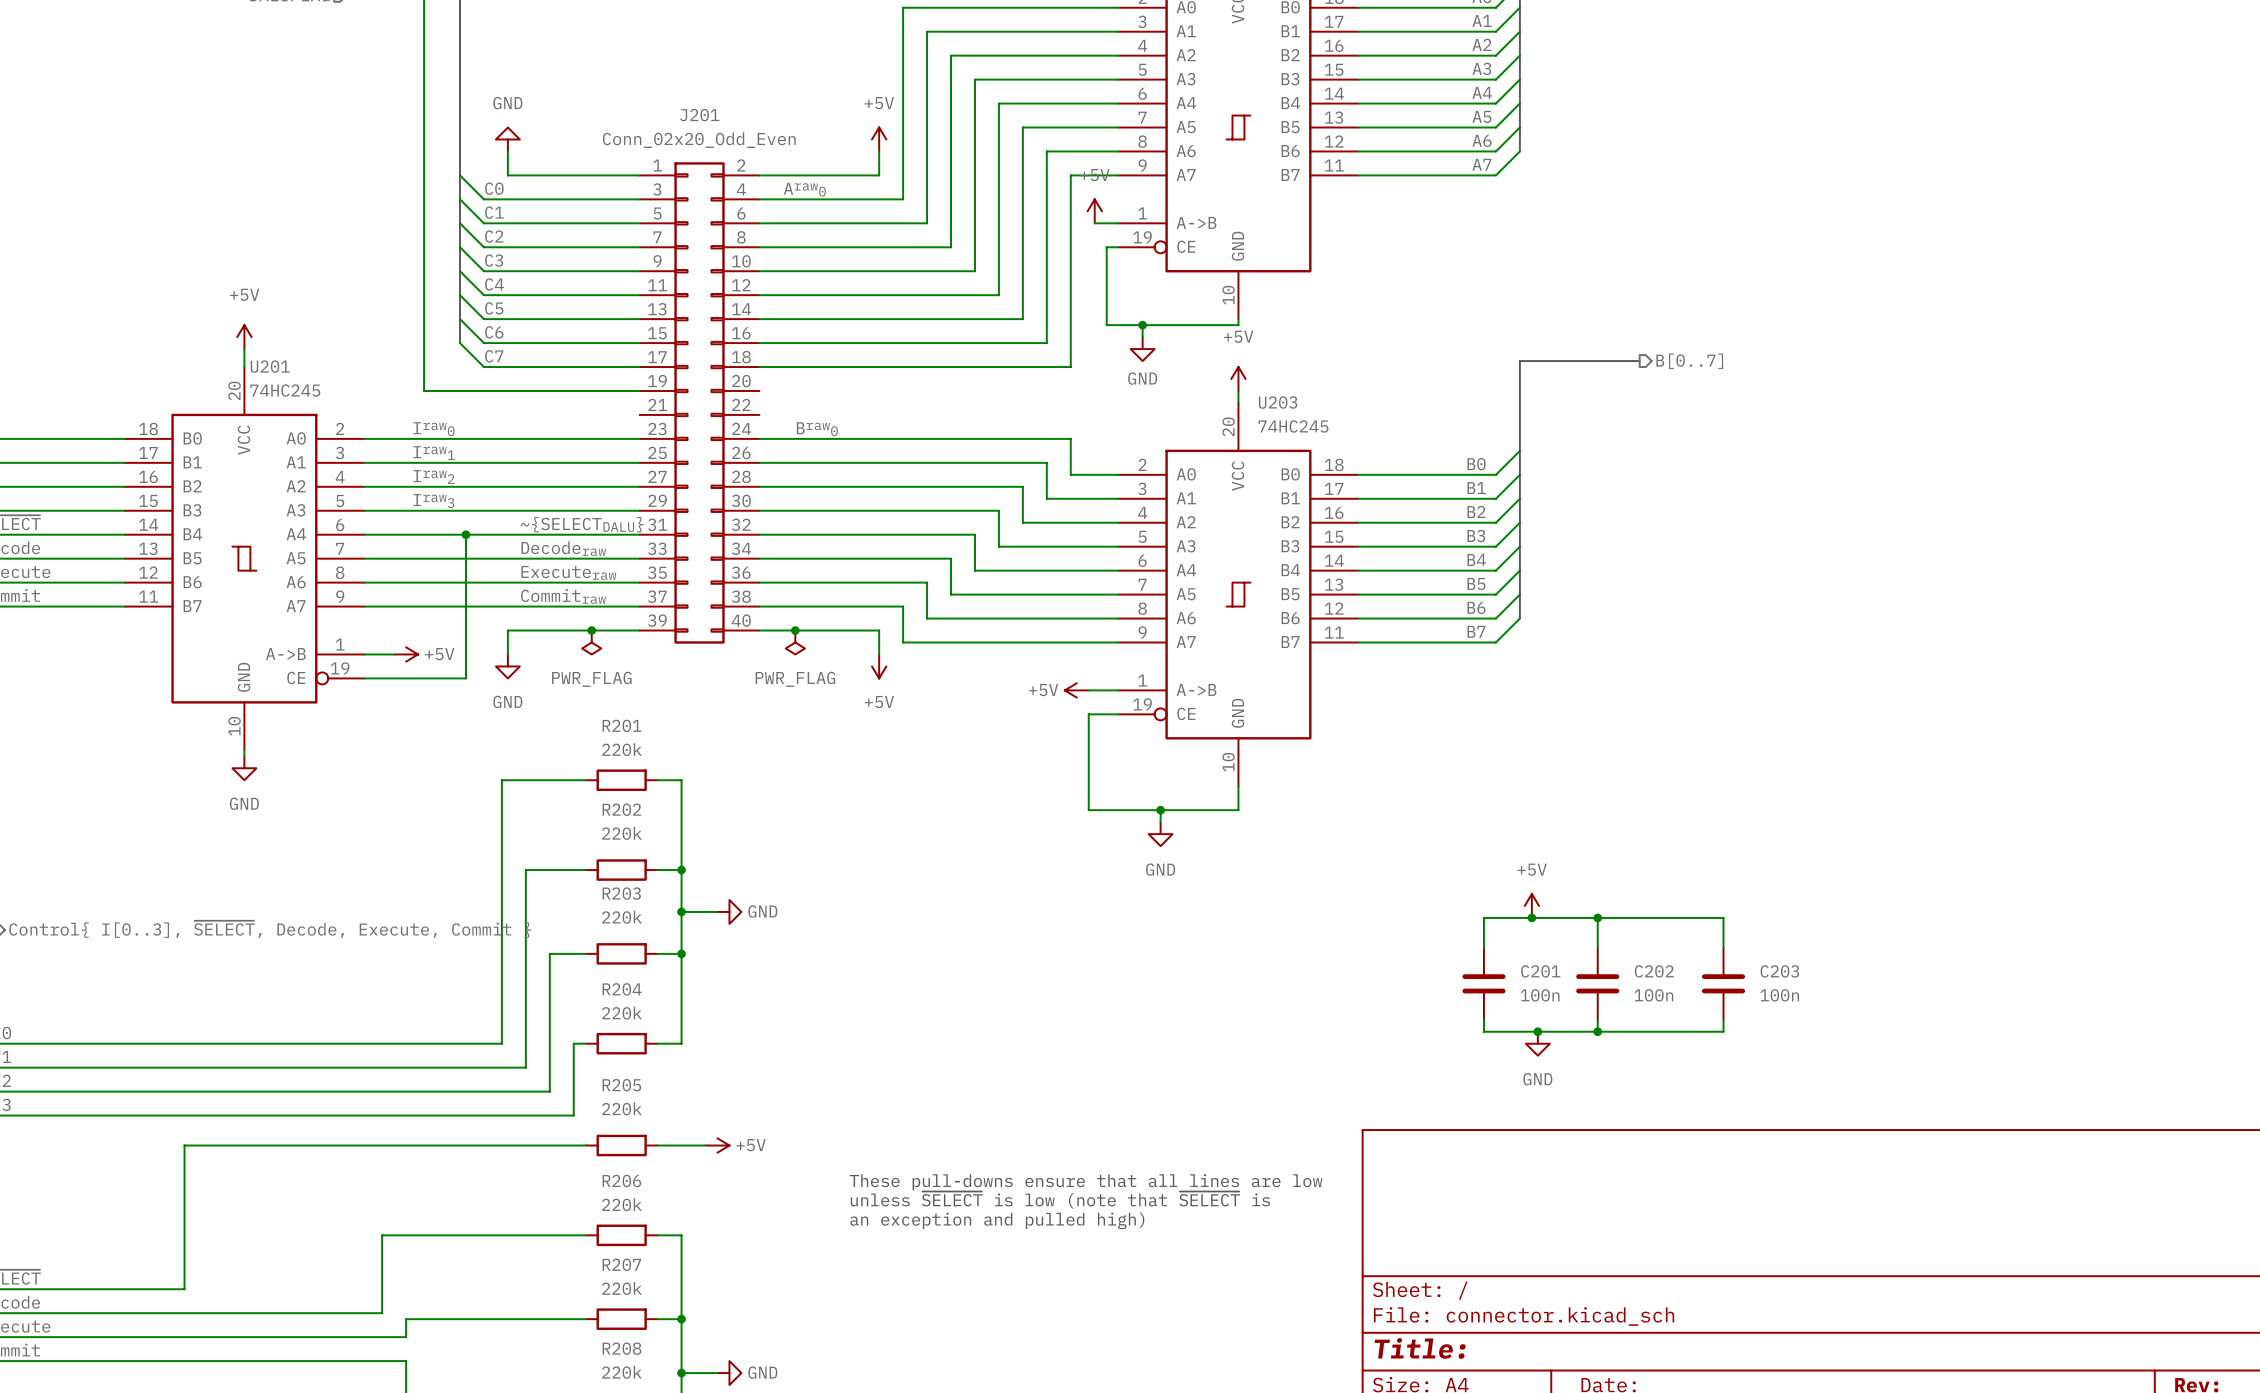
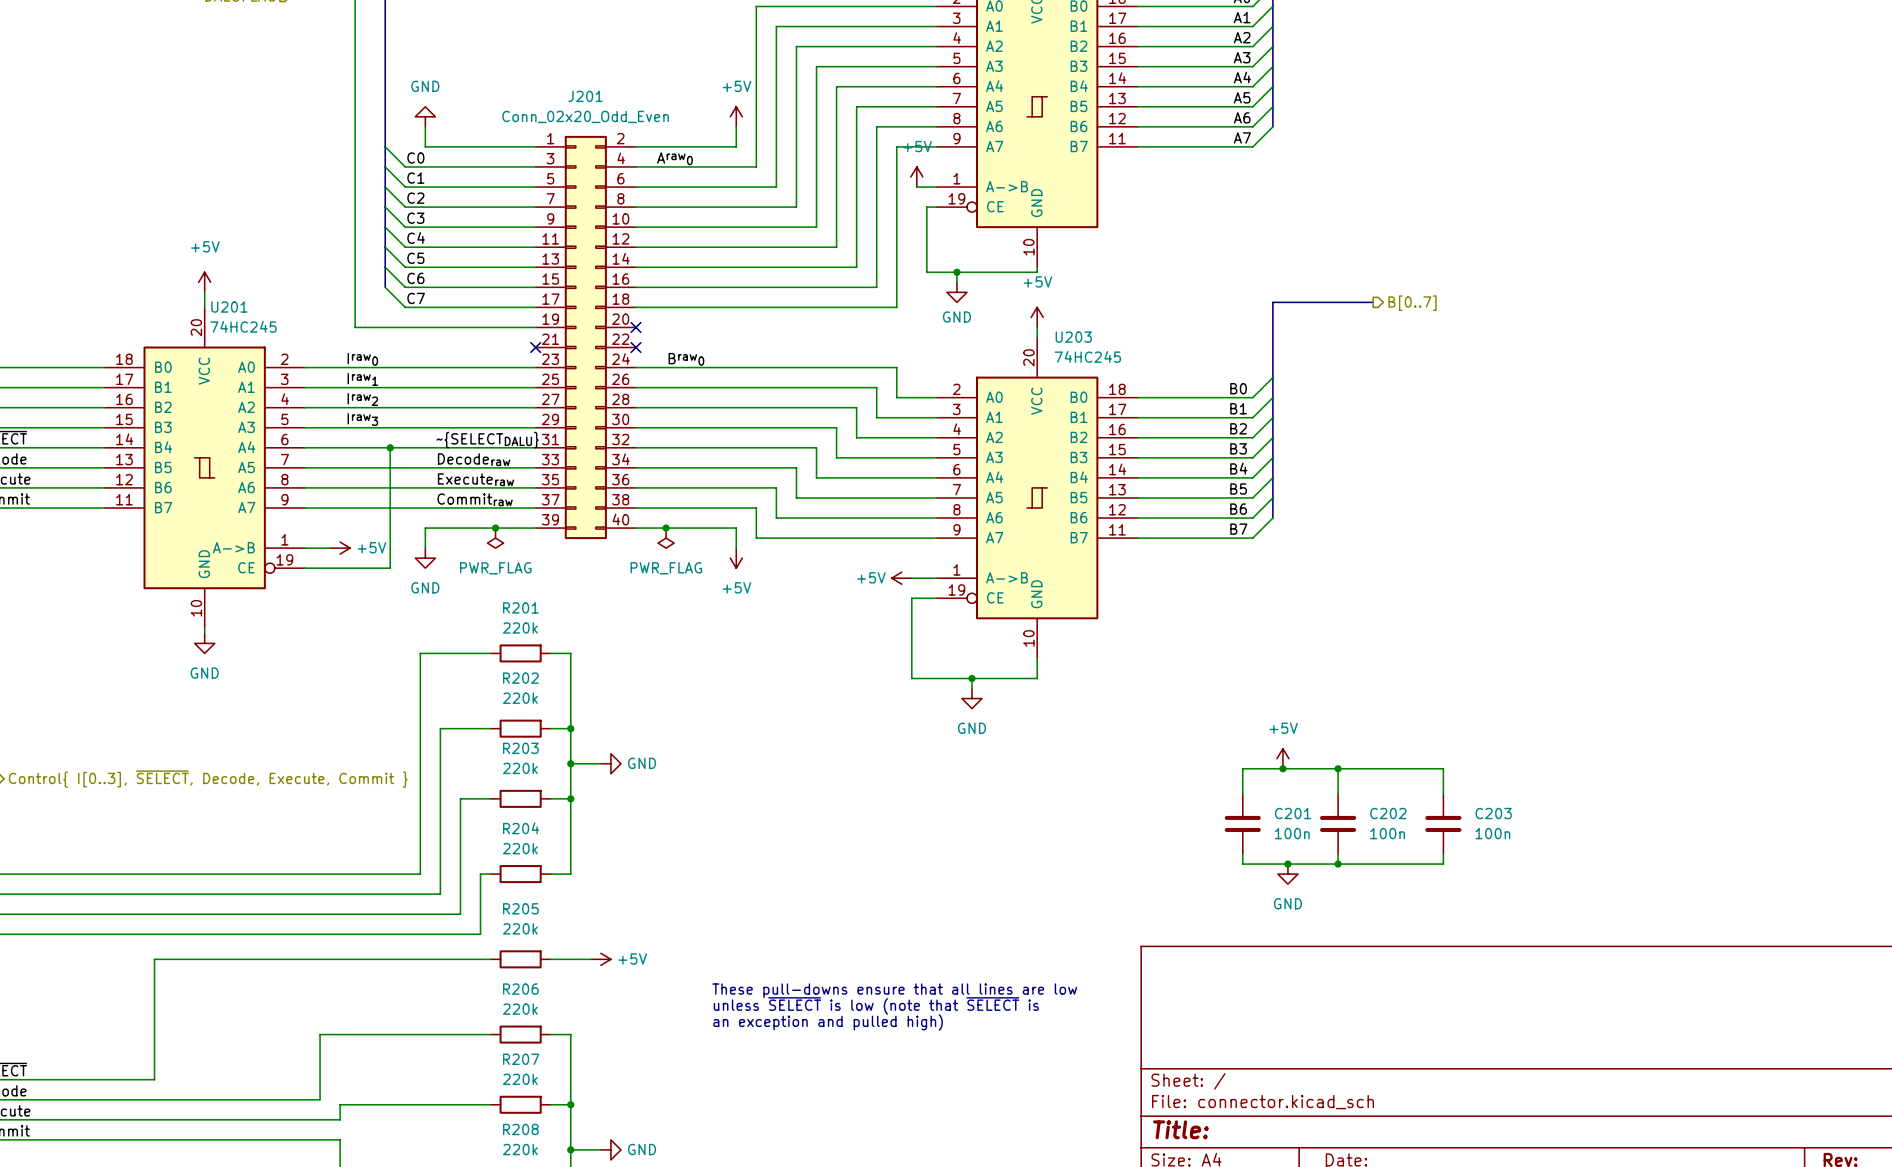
no-connect mark: none -> (635, 327)
no-connect mark: none -> (535, 347)
no-connect mark: none -> (635, 347)

